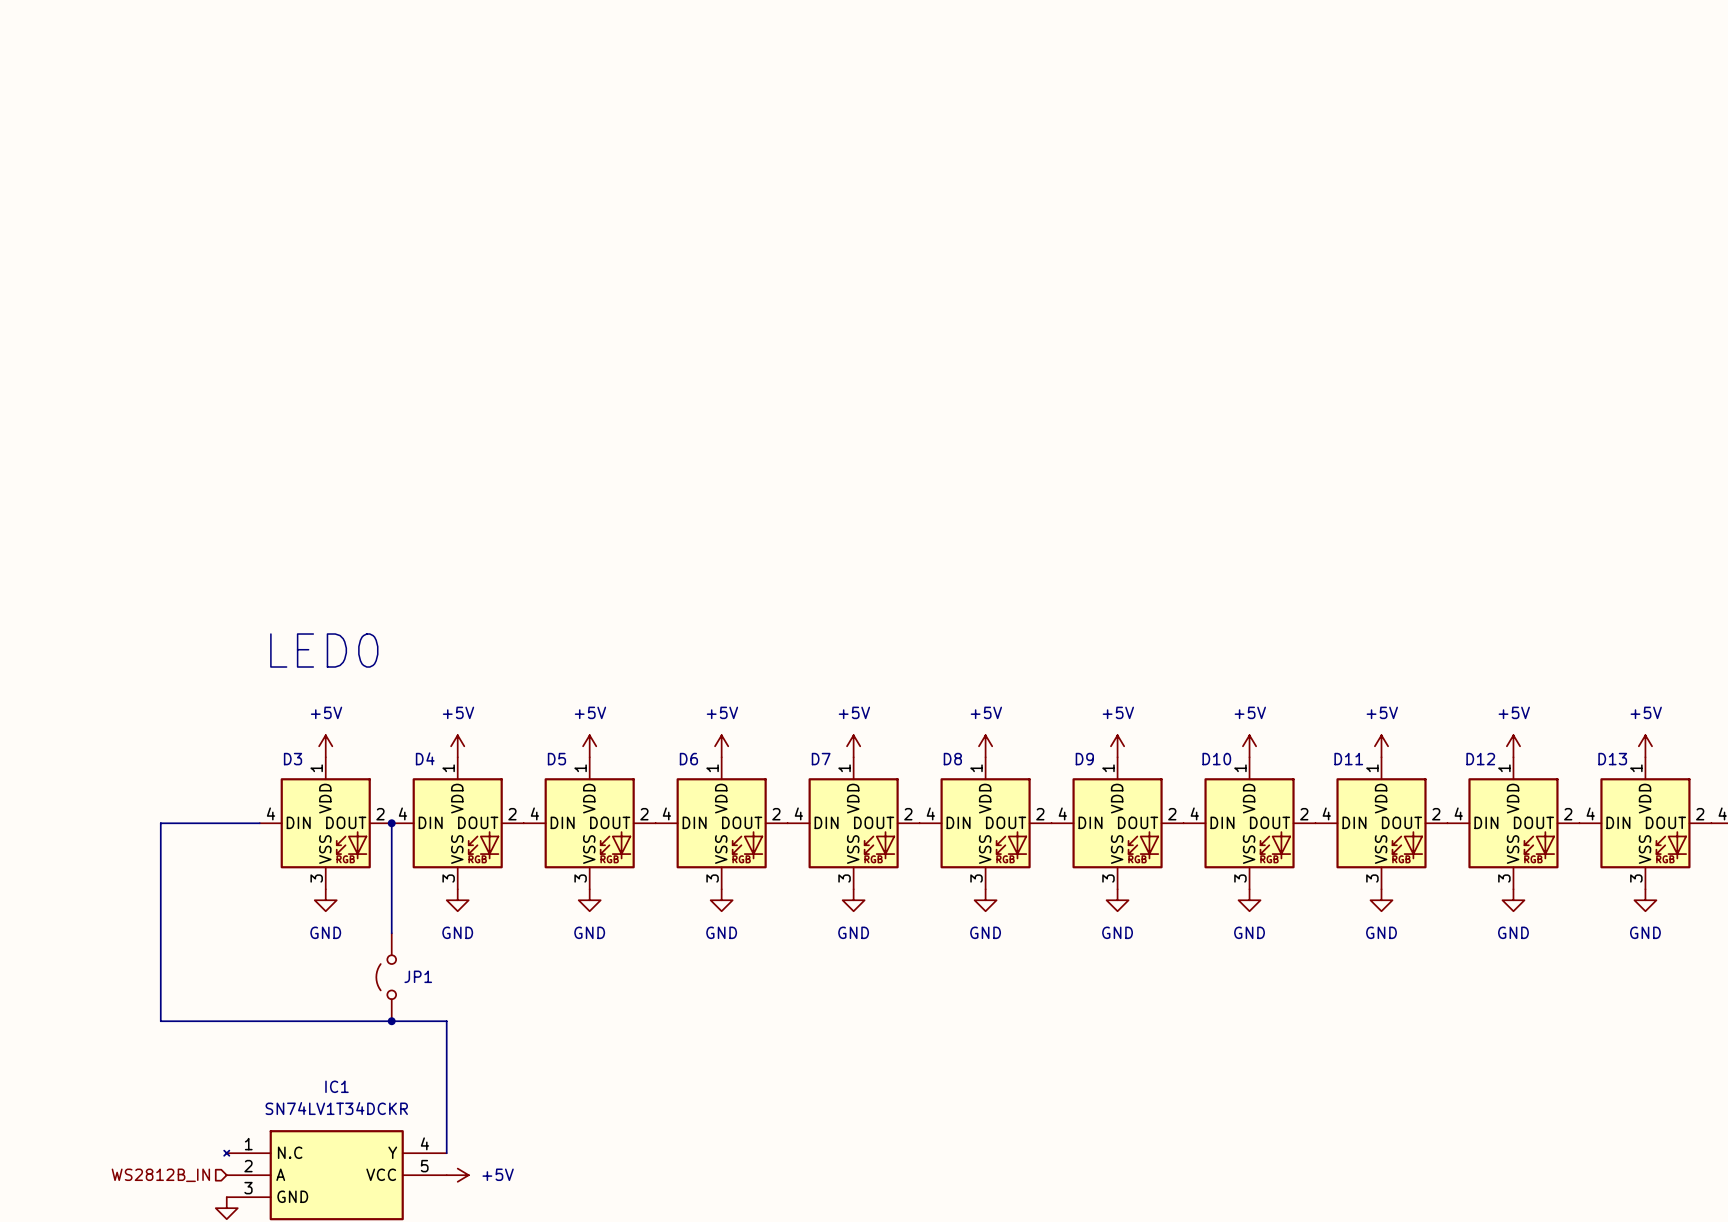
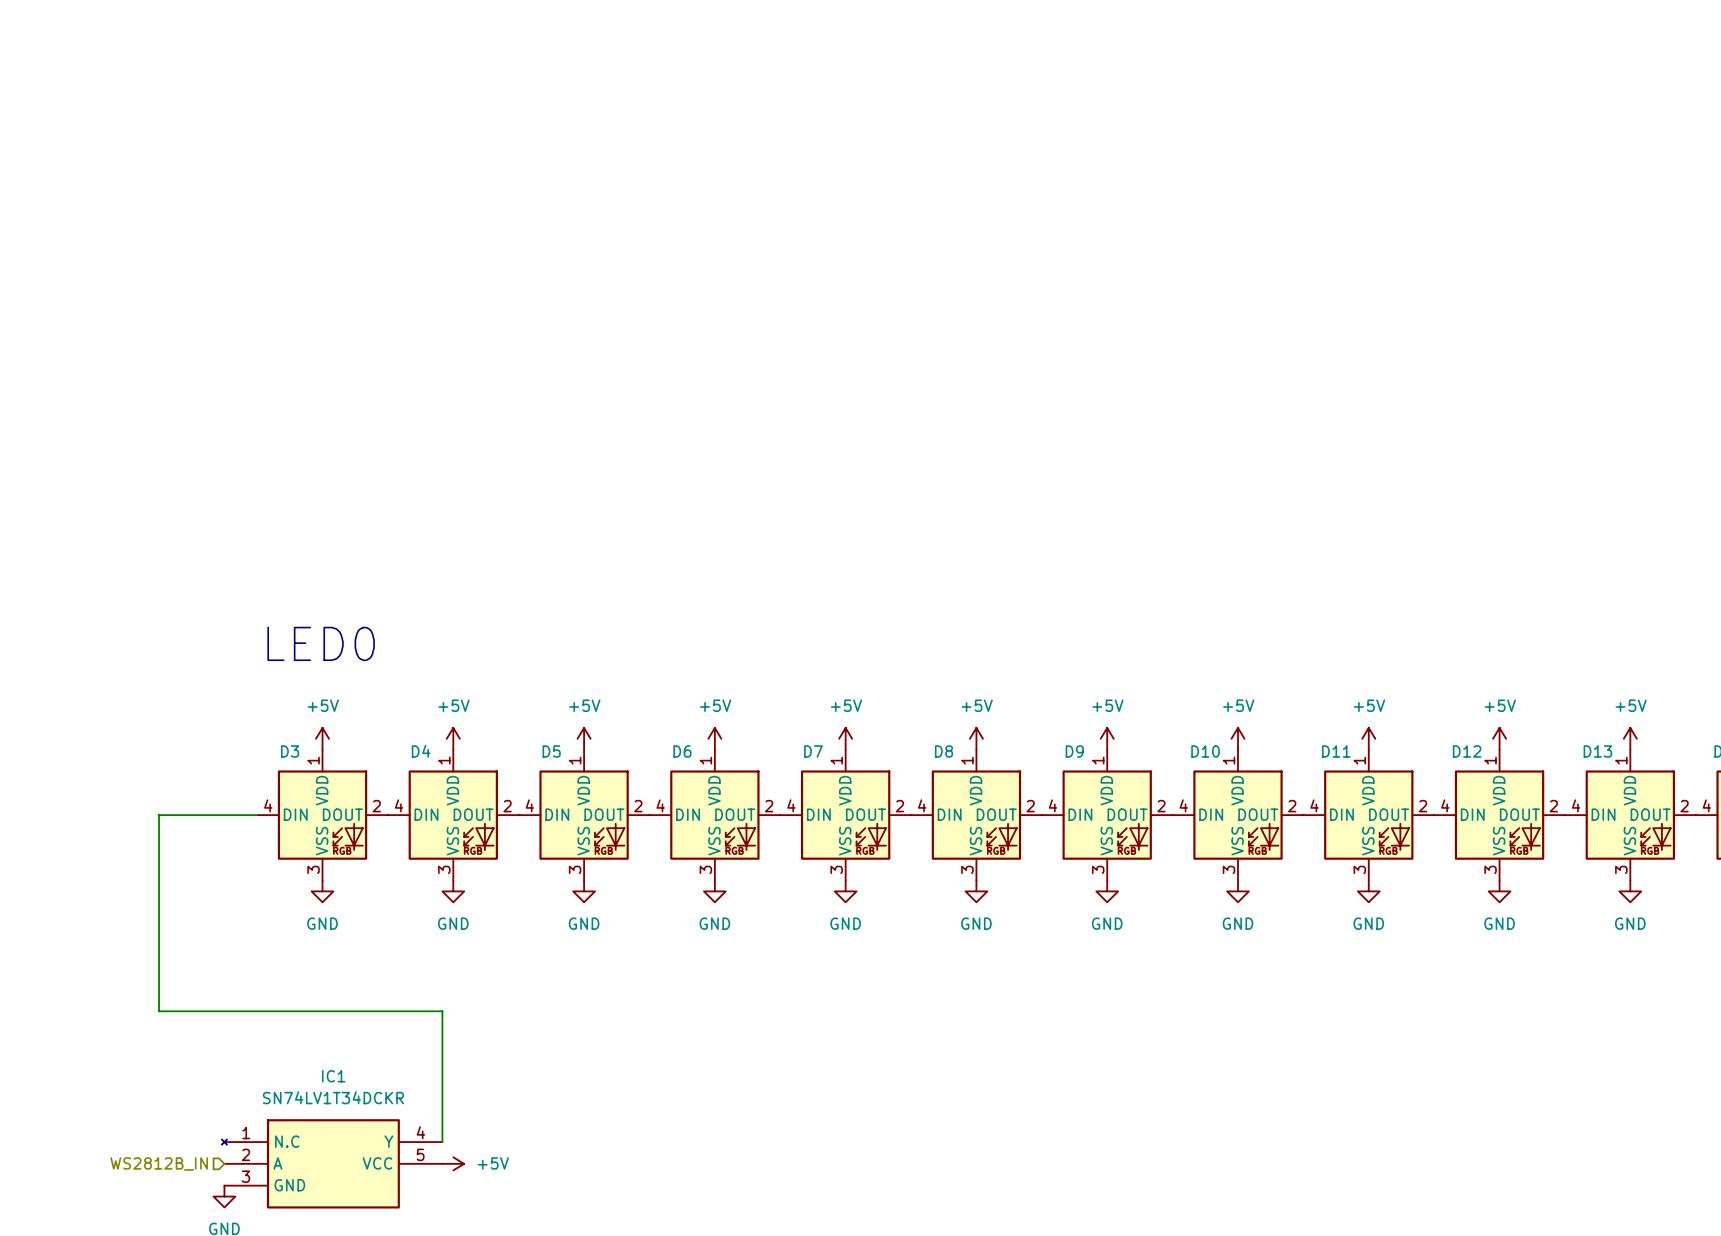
wire: (391, 823) (391, 933) -> none
junction: (391, 823) -> none
JP1: (386, 977) -> none
junction: (391, 1021) -> none

